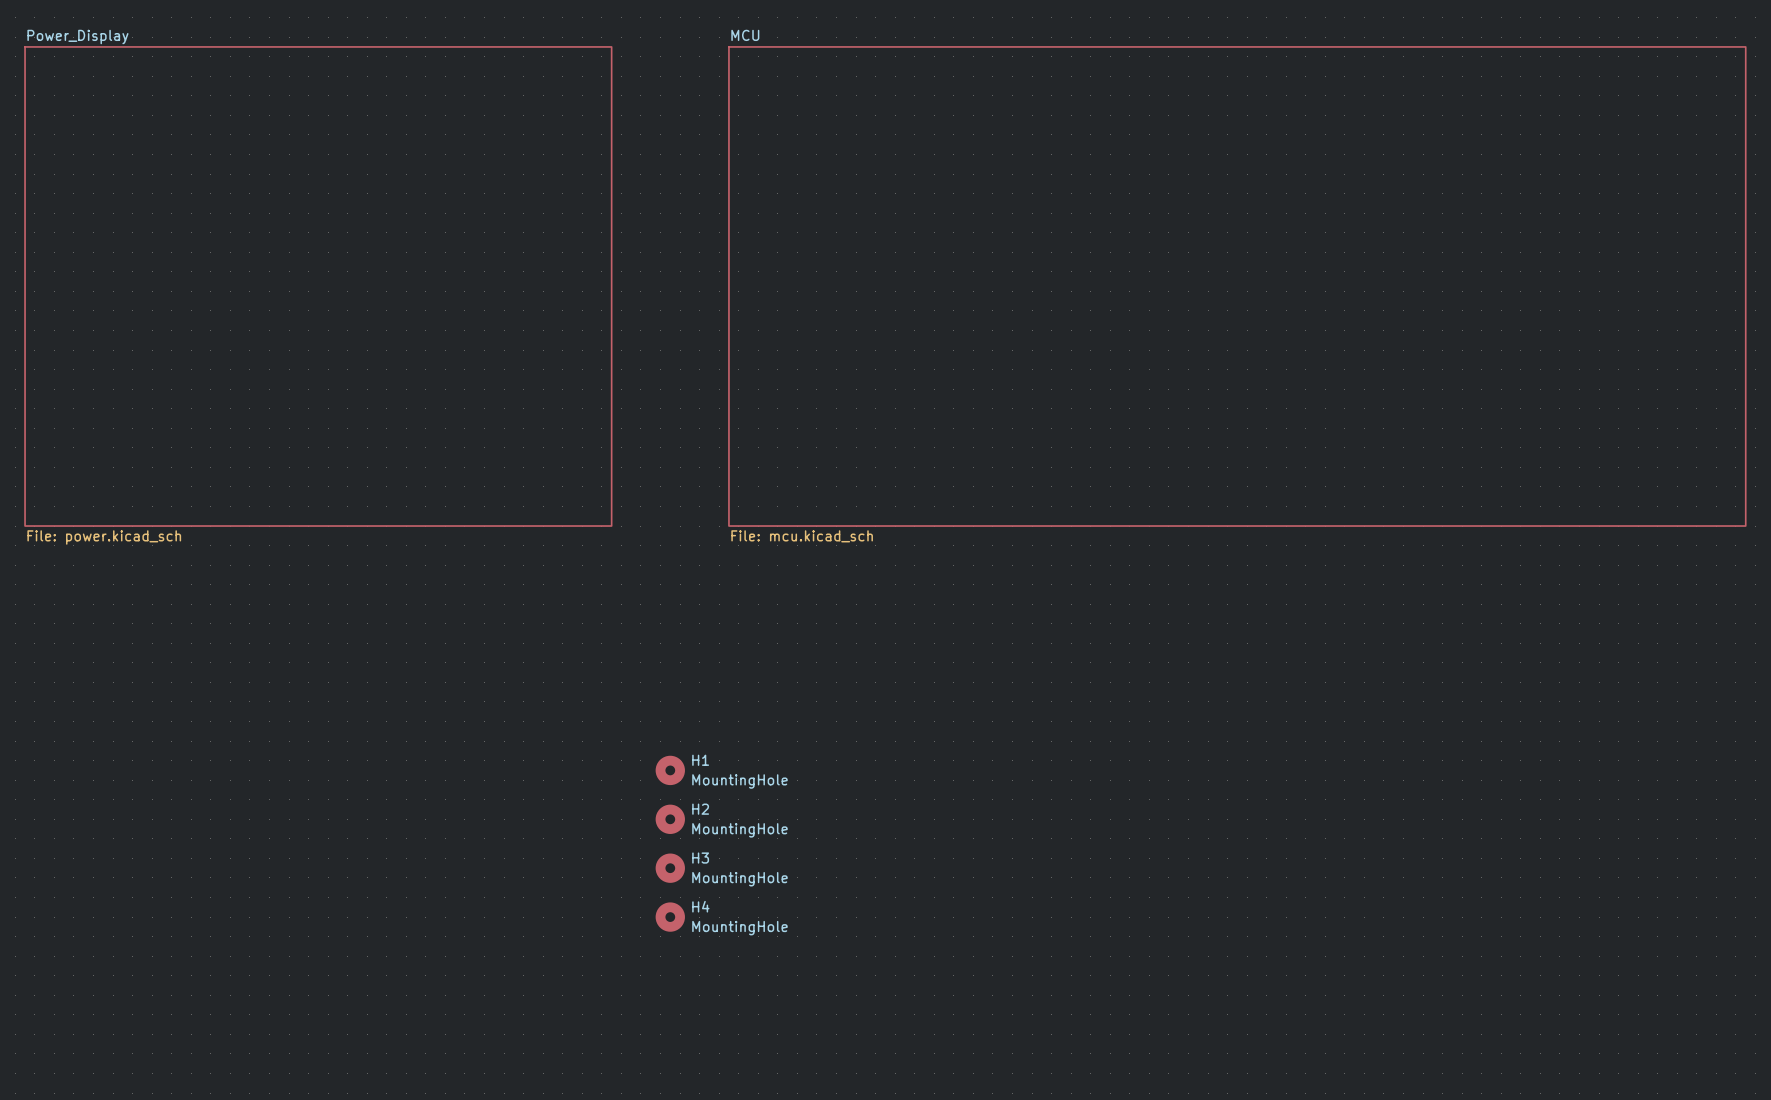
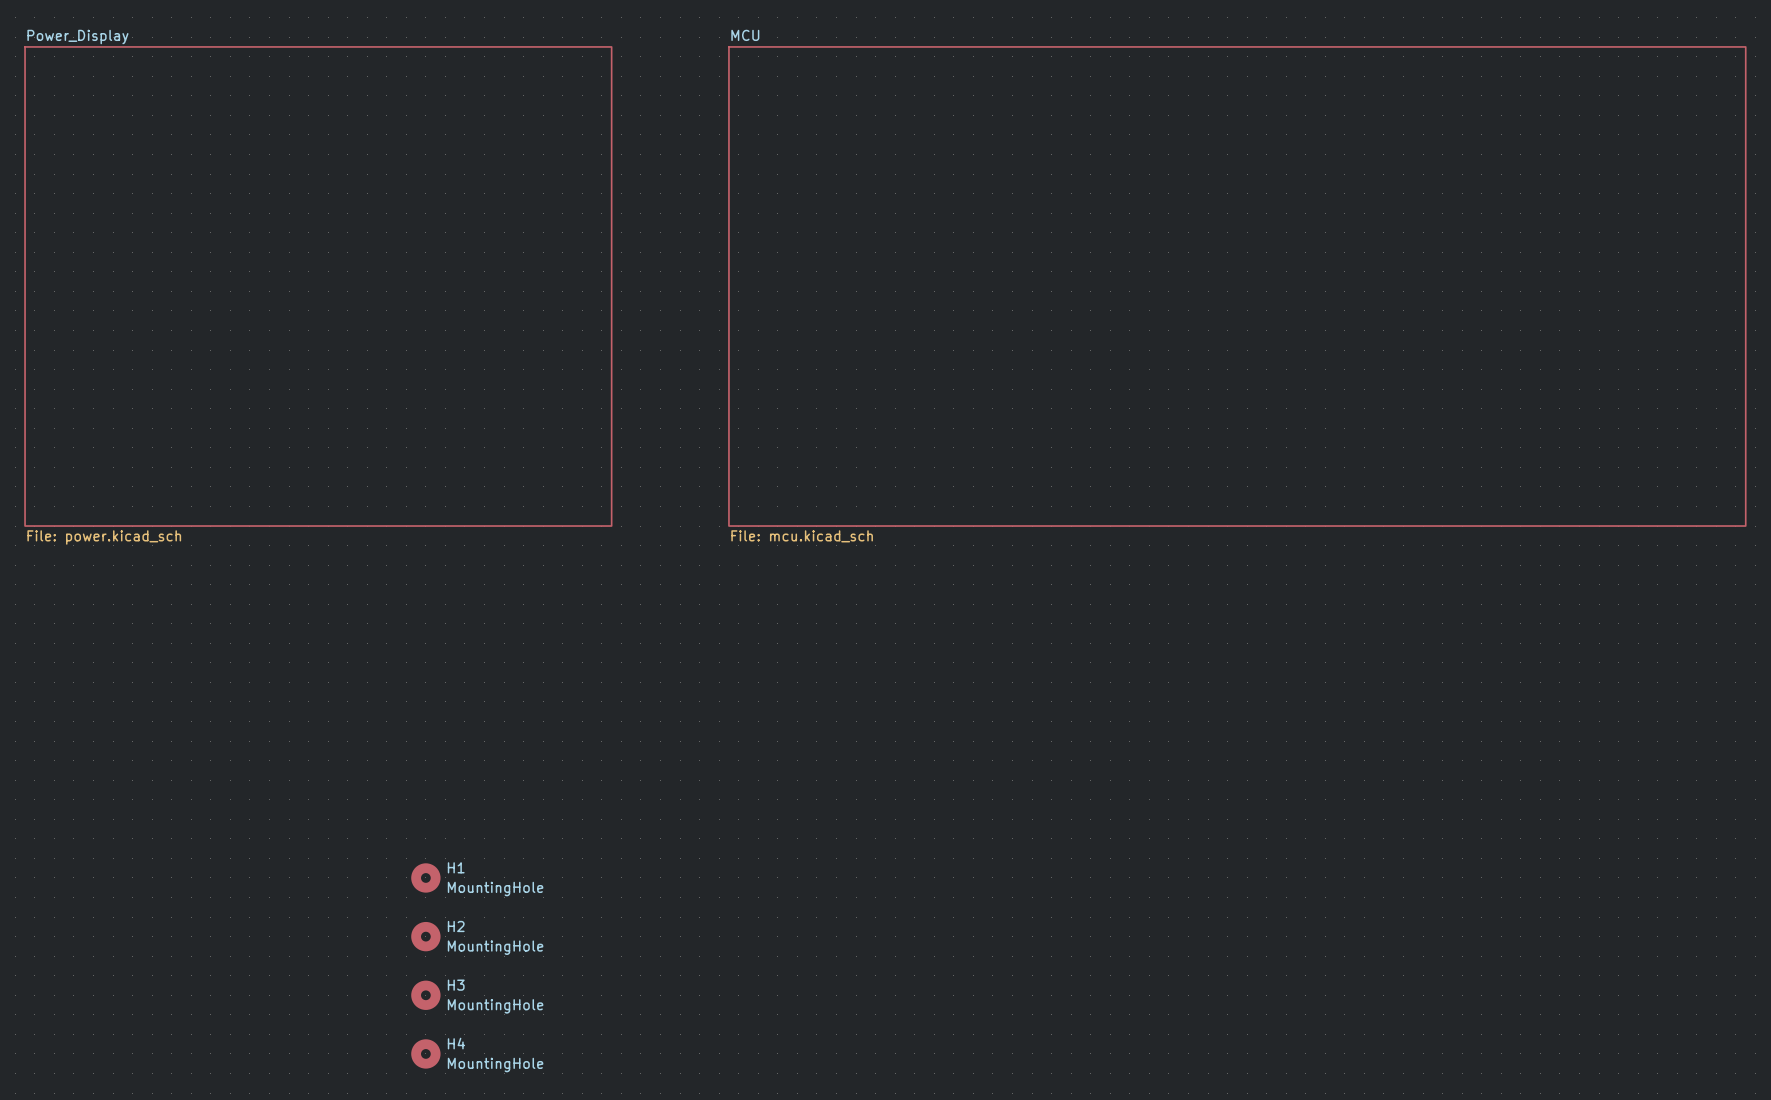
H1 position: (670, 770) -> (425, 877)
H2 position: (670, 819) -> (425, 936)
H3 position: (670, 868) -> (425, 995)
H4 position: (670, 917) -> (425, 1053)

